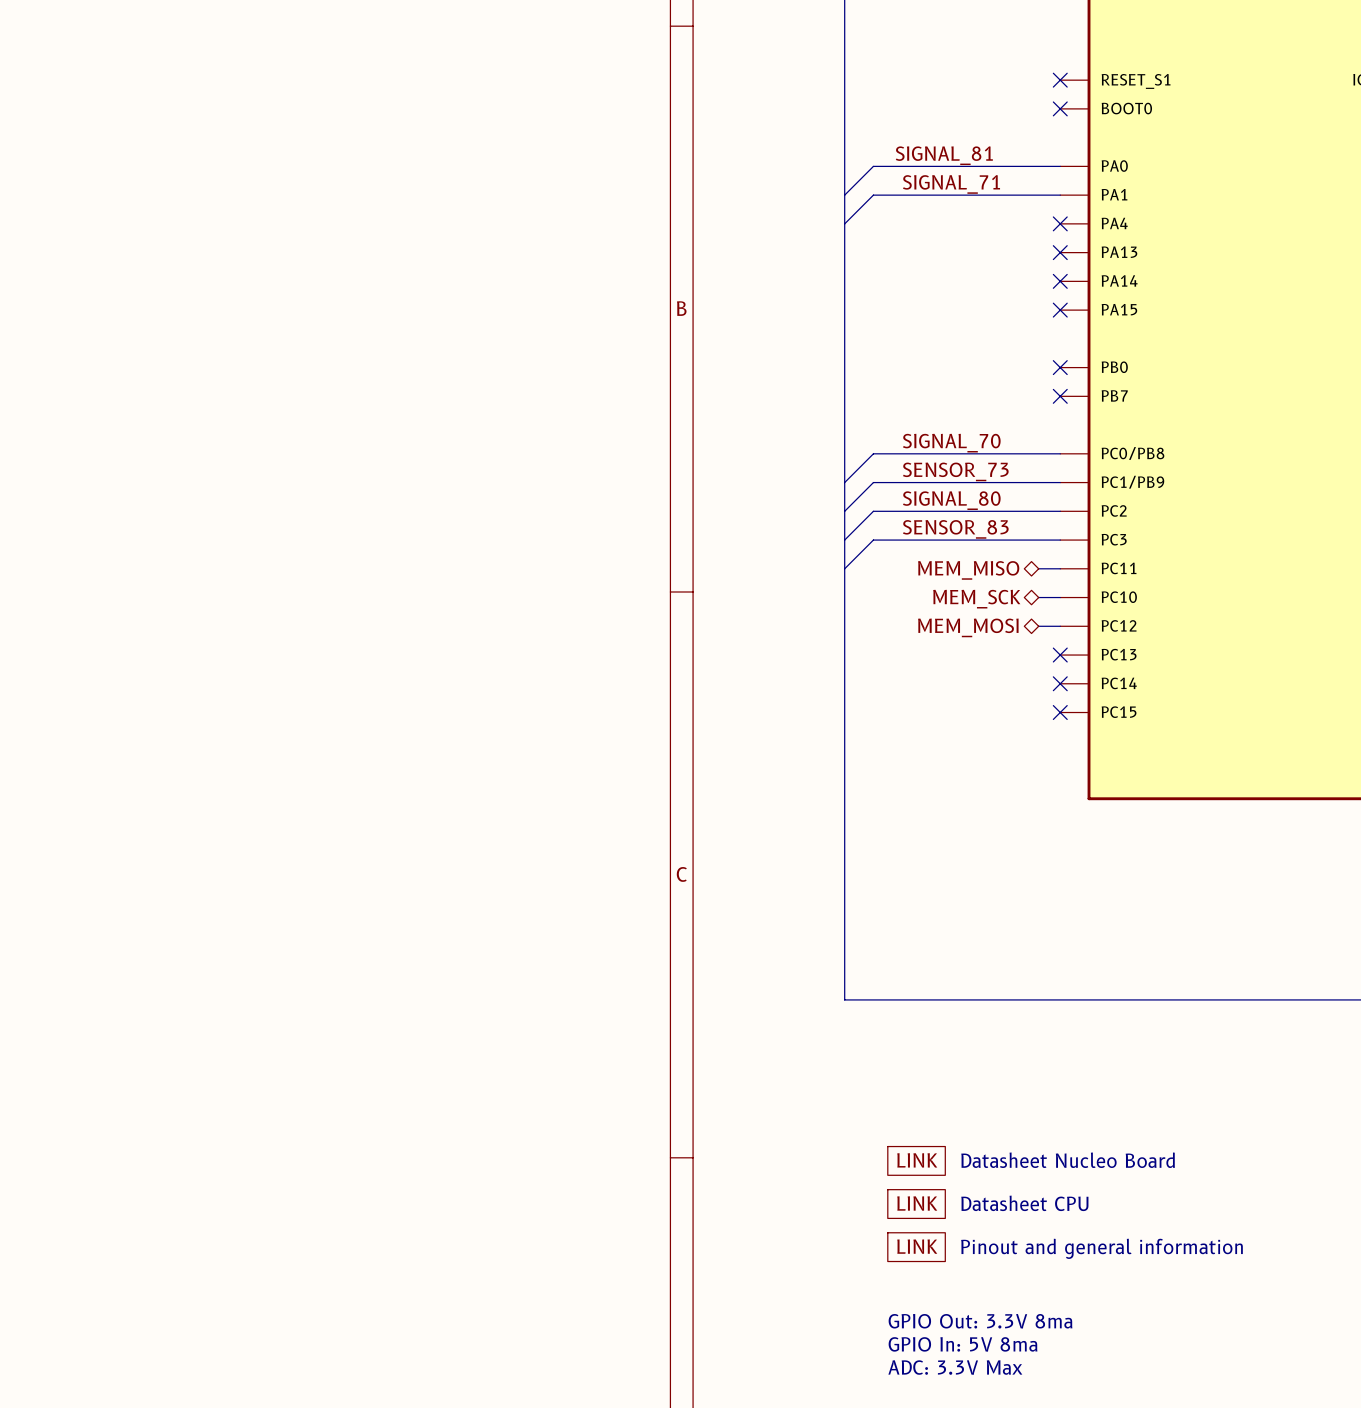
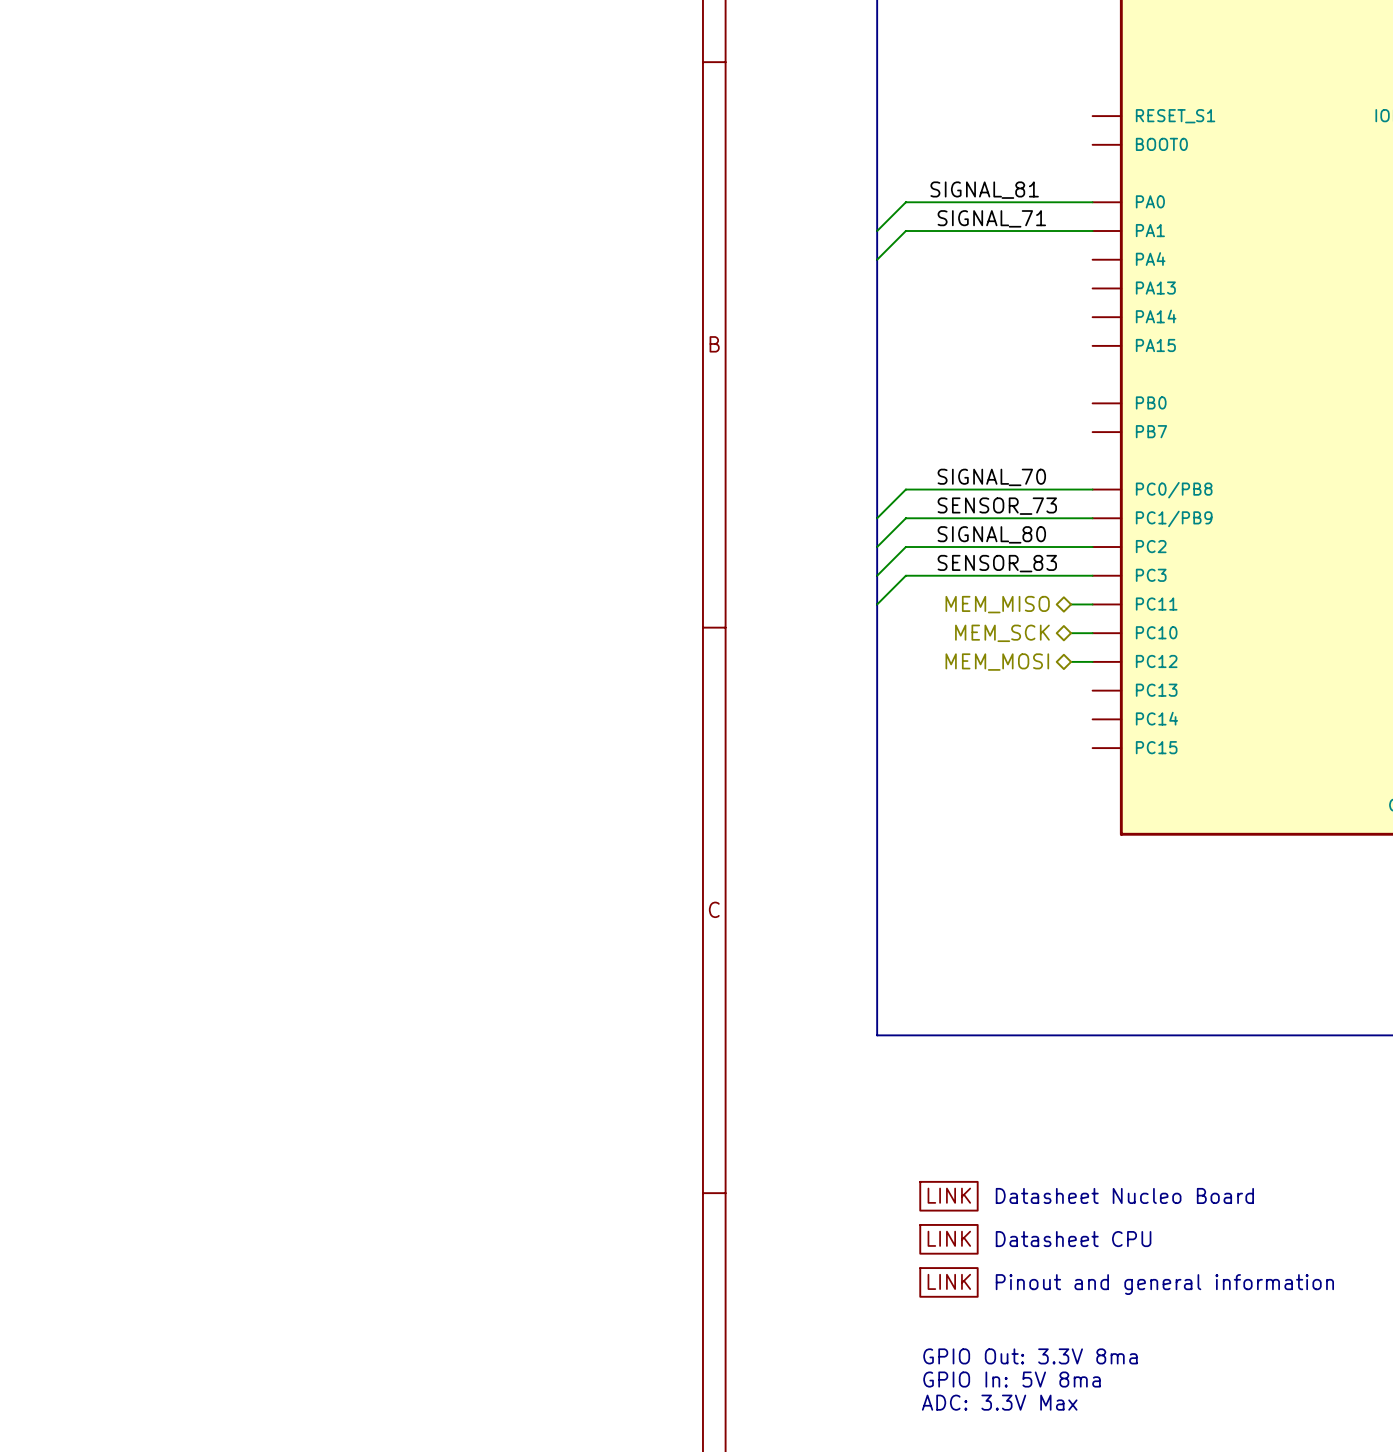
no-connect mark: (1060, 80) -> none
no-connect mark: (1060, 108) -> none
no-connect mark: (1060, 223) -> none
no-connect mark: (1060, 252) -> none
no-connect mark: (1060, 281) -> none
no-connect mark: (1060, 310) -> none
no-connect mark: (1060, 367) -> none
no-connect mark: (1060, 396) -> none
no-connect mark: (1060, 655) -> none
no-connect mark: (1060, 683) -> none
no-connect mark: (1060, 712) -> none

